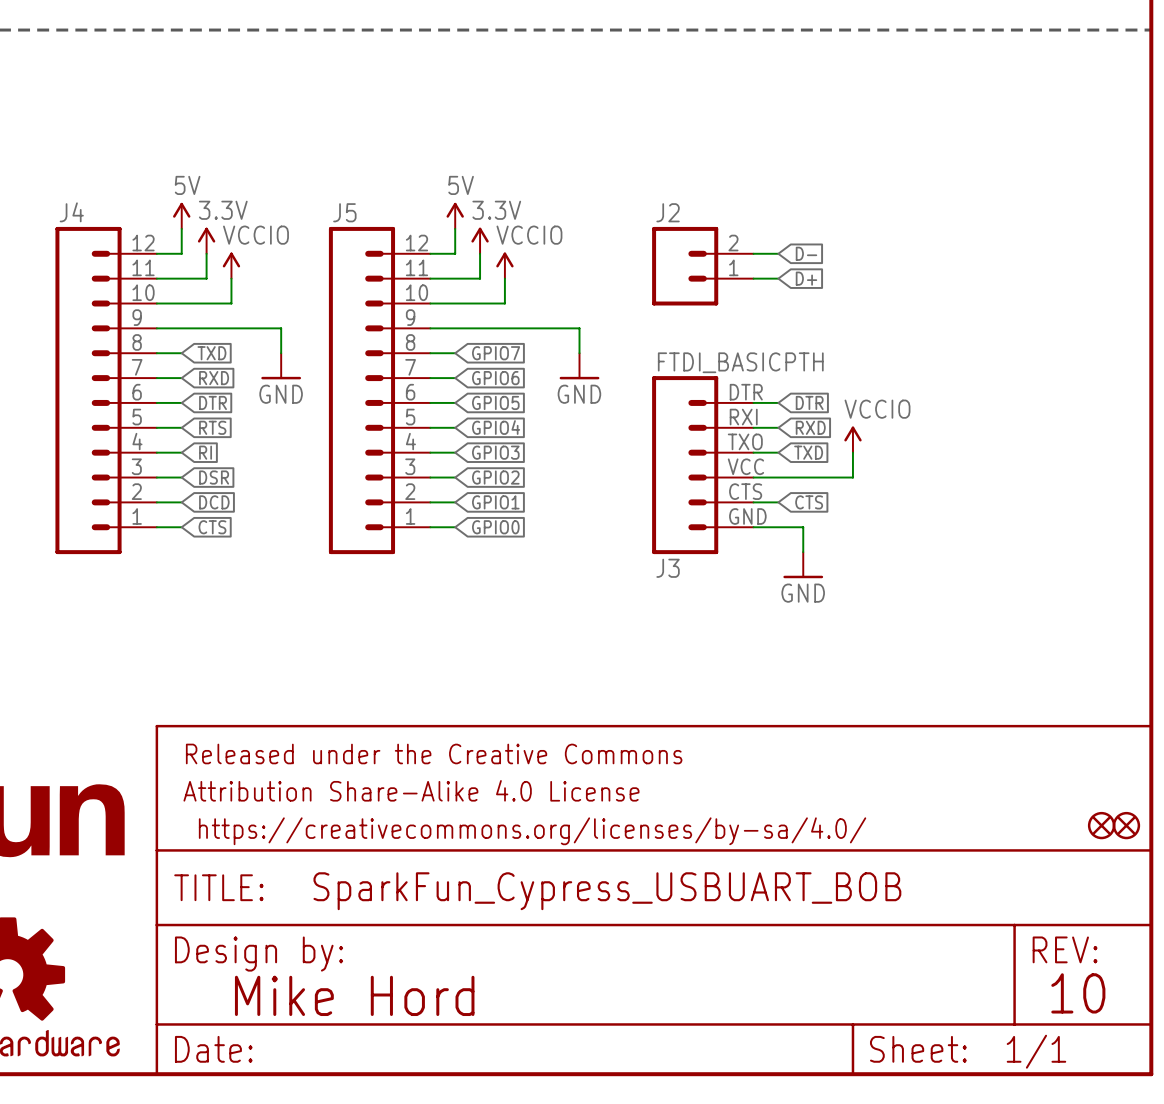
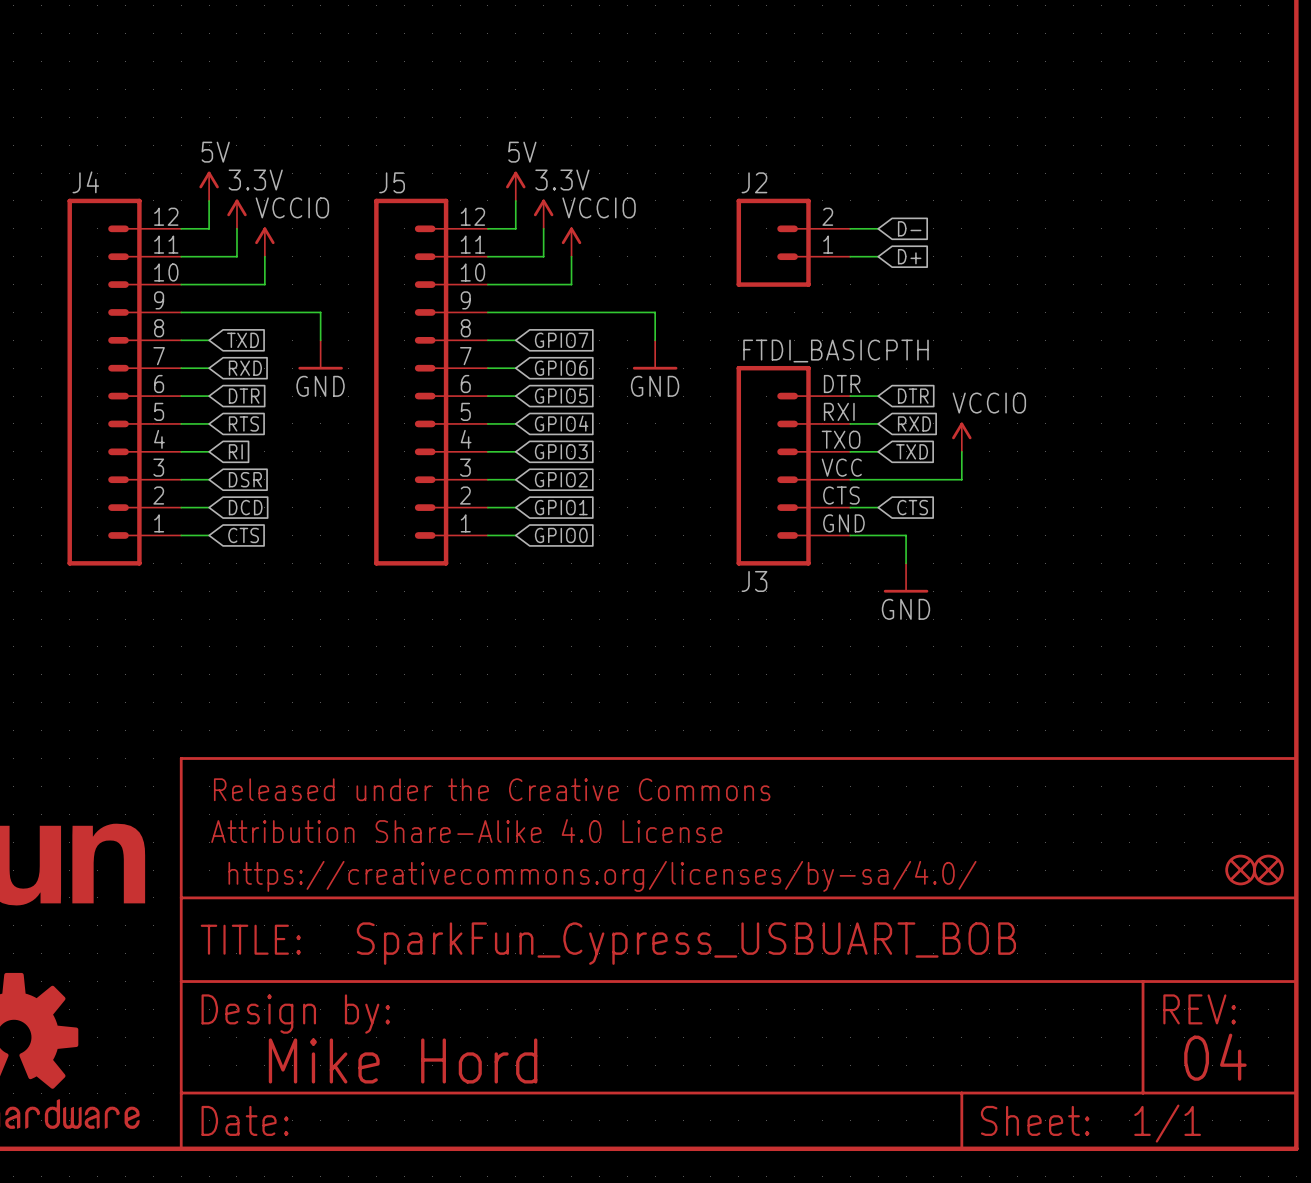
text: 10 (1078, 993) -> 04 (1215, 1057)

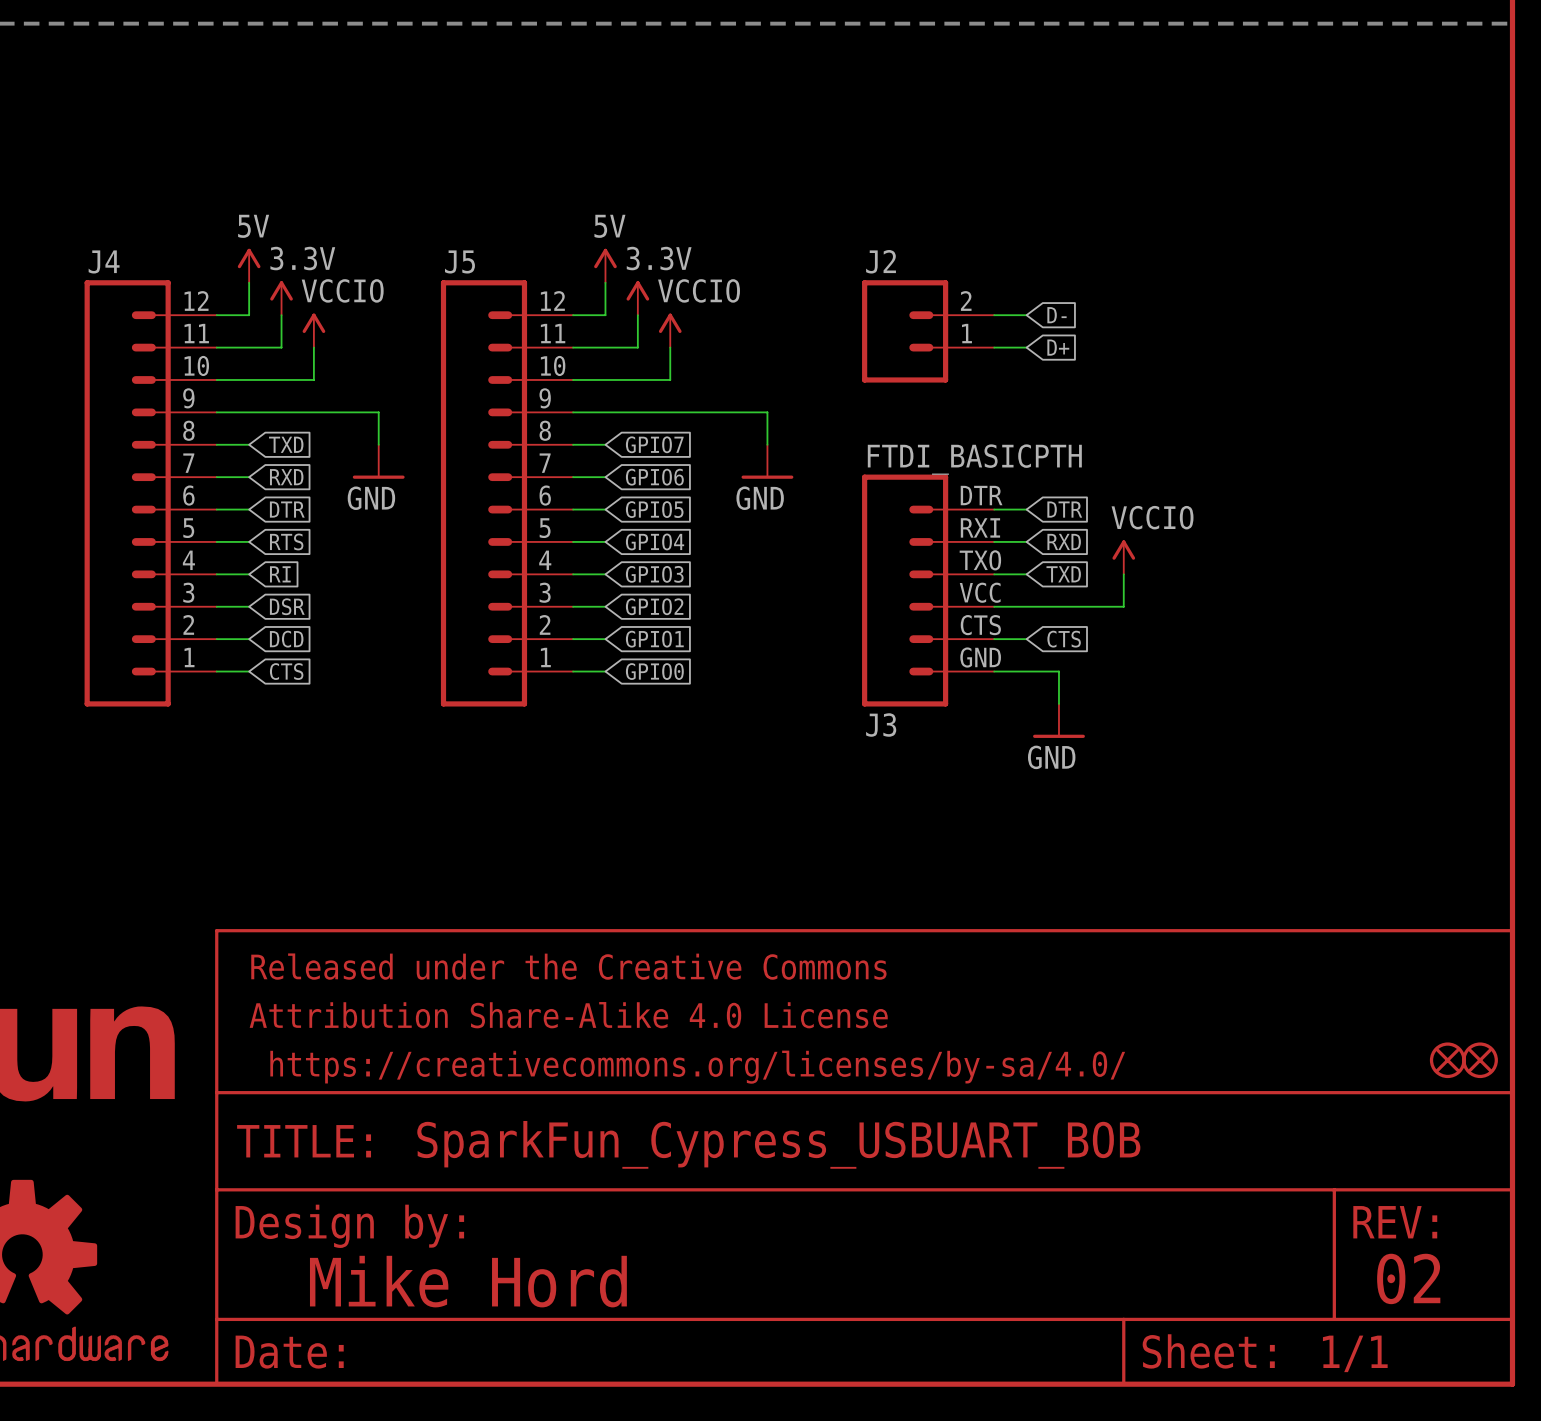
text: 04 (1215, 1057) -> 02 (1408, 1278)

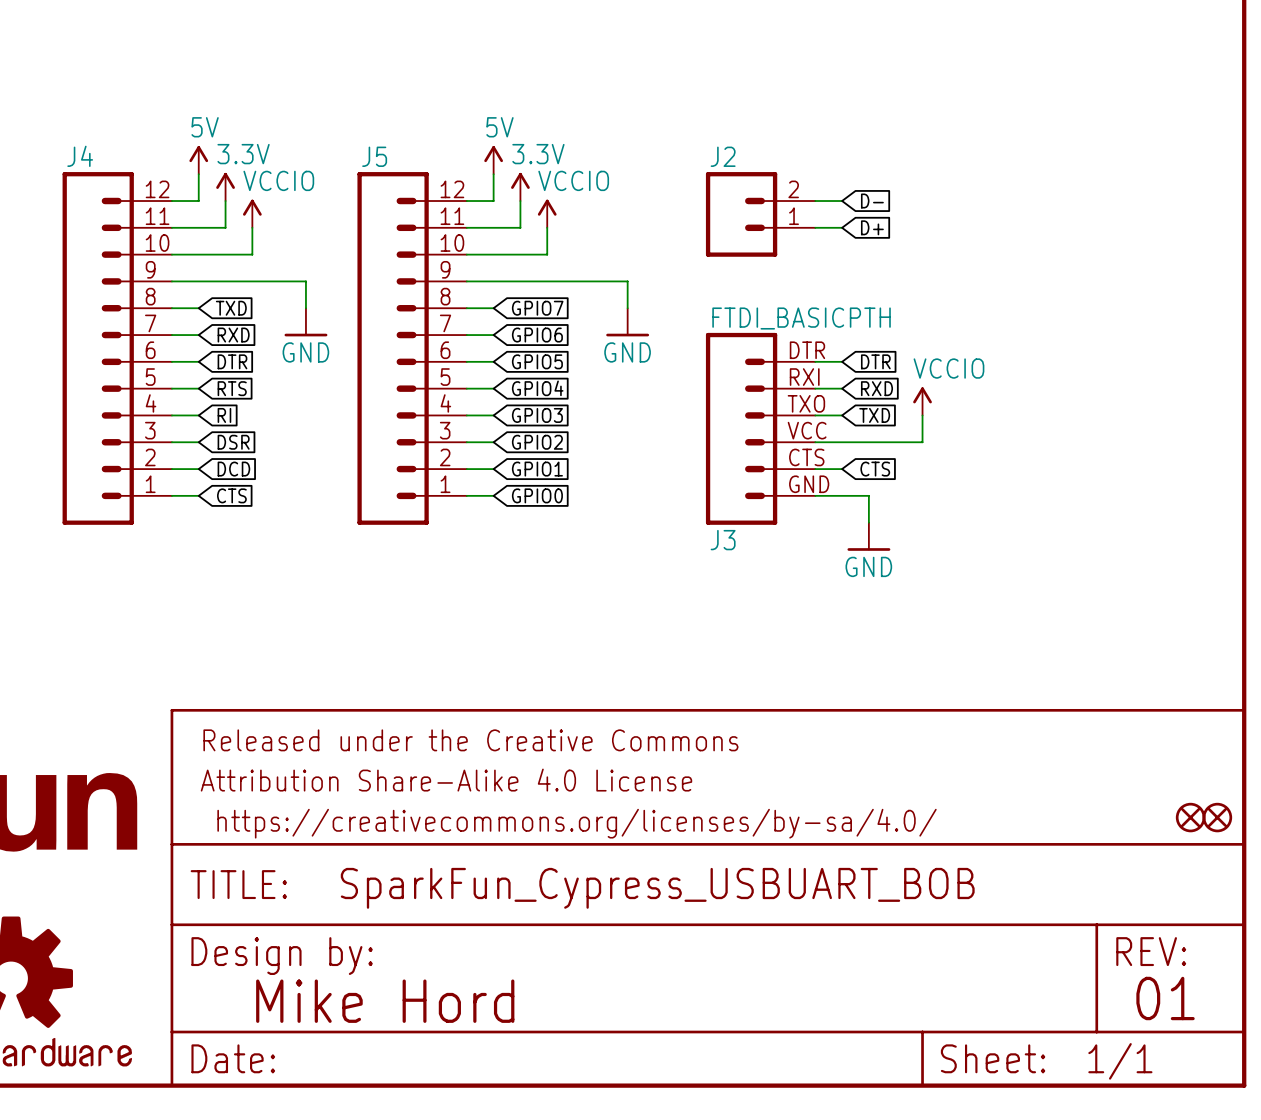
text: 02 (1408, 1278) -> 01 (1165, 998)

